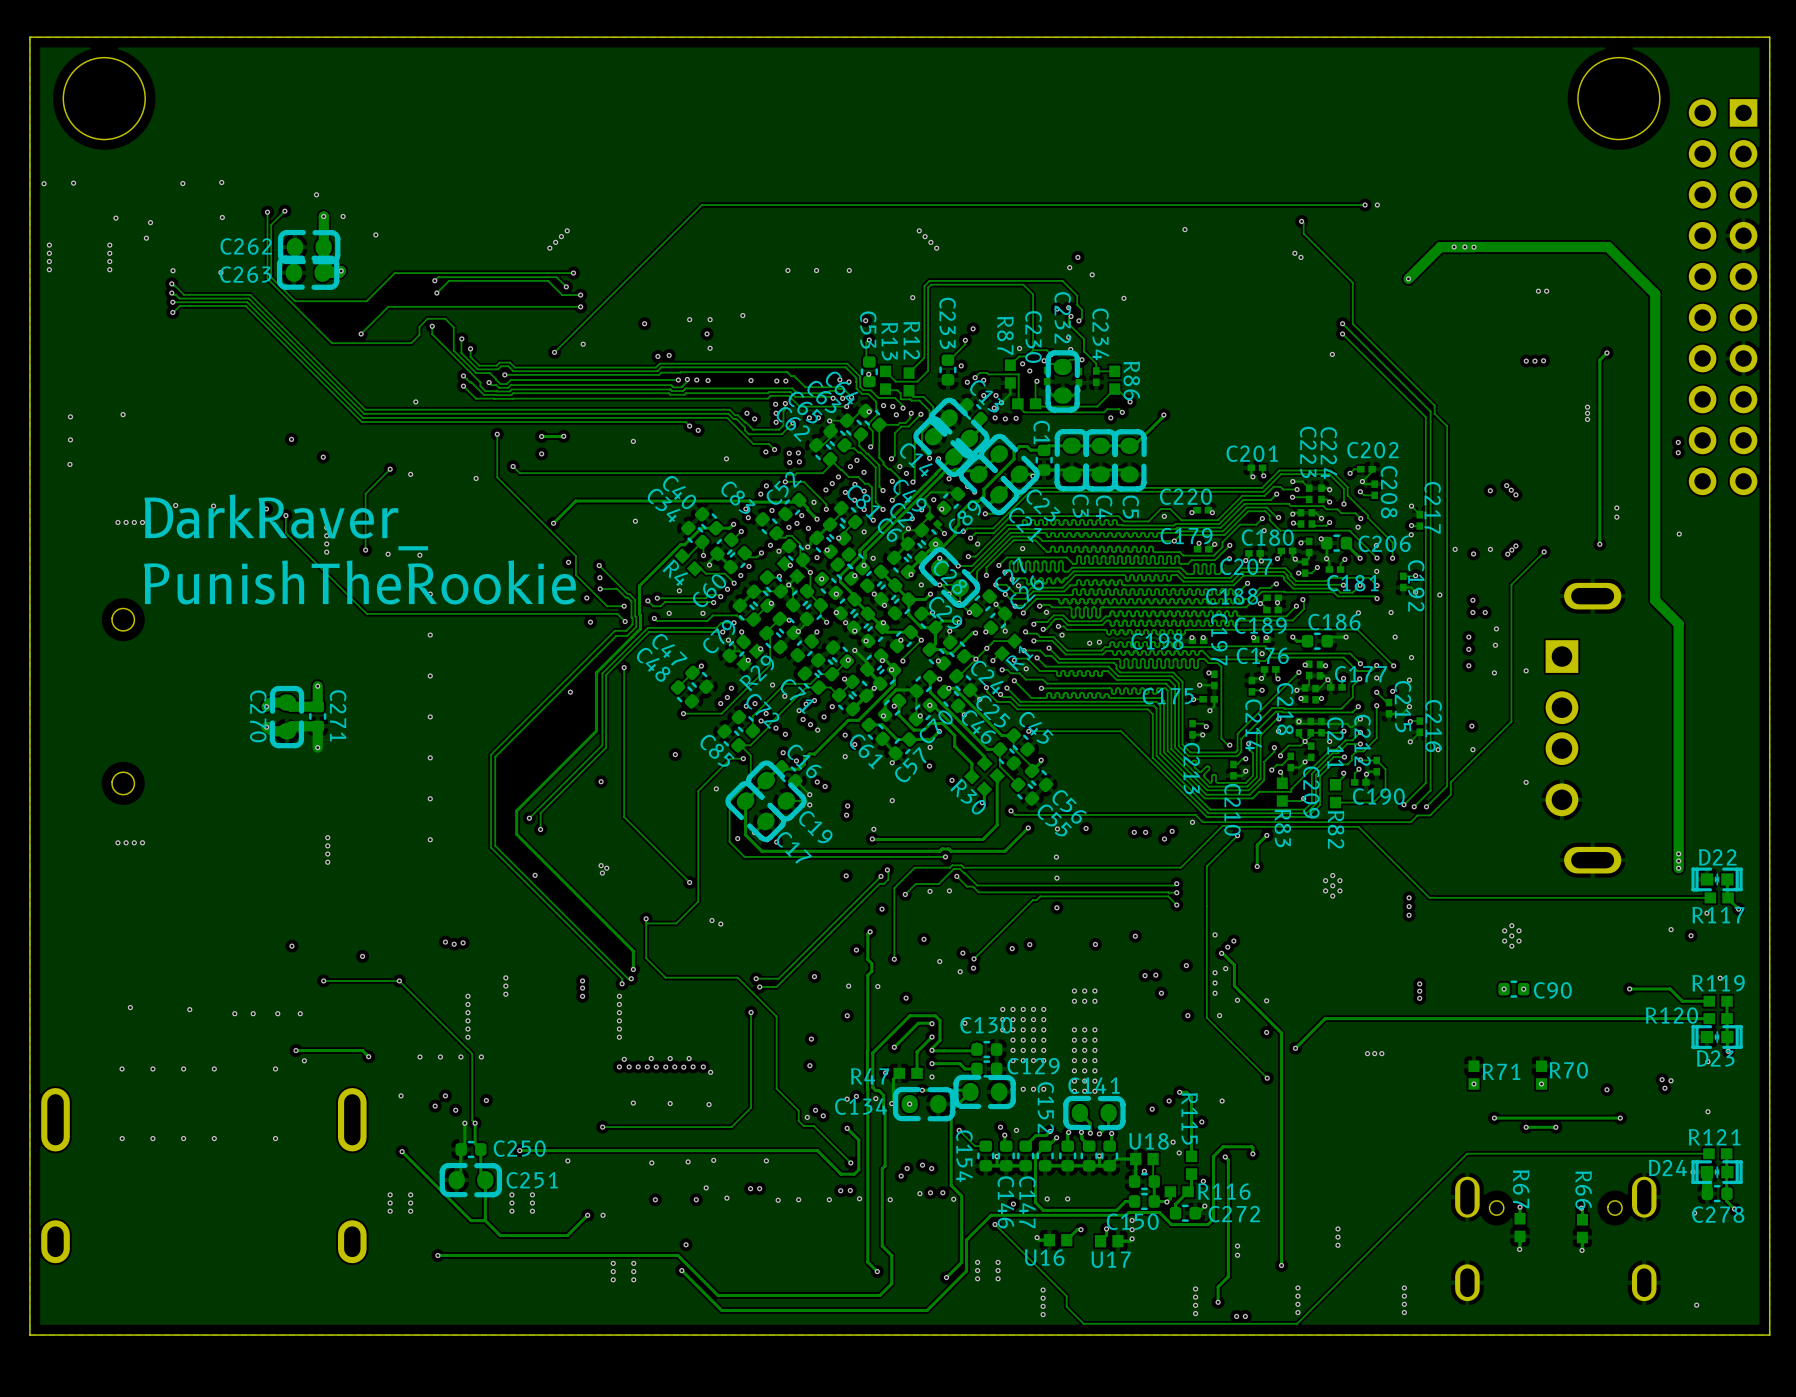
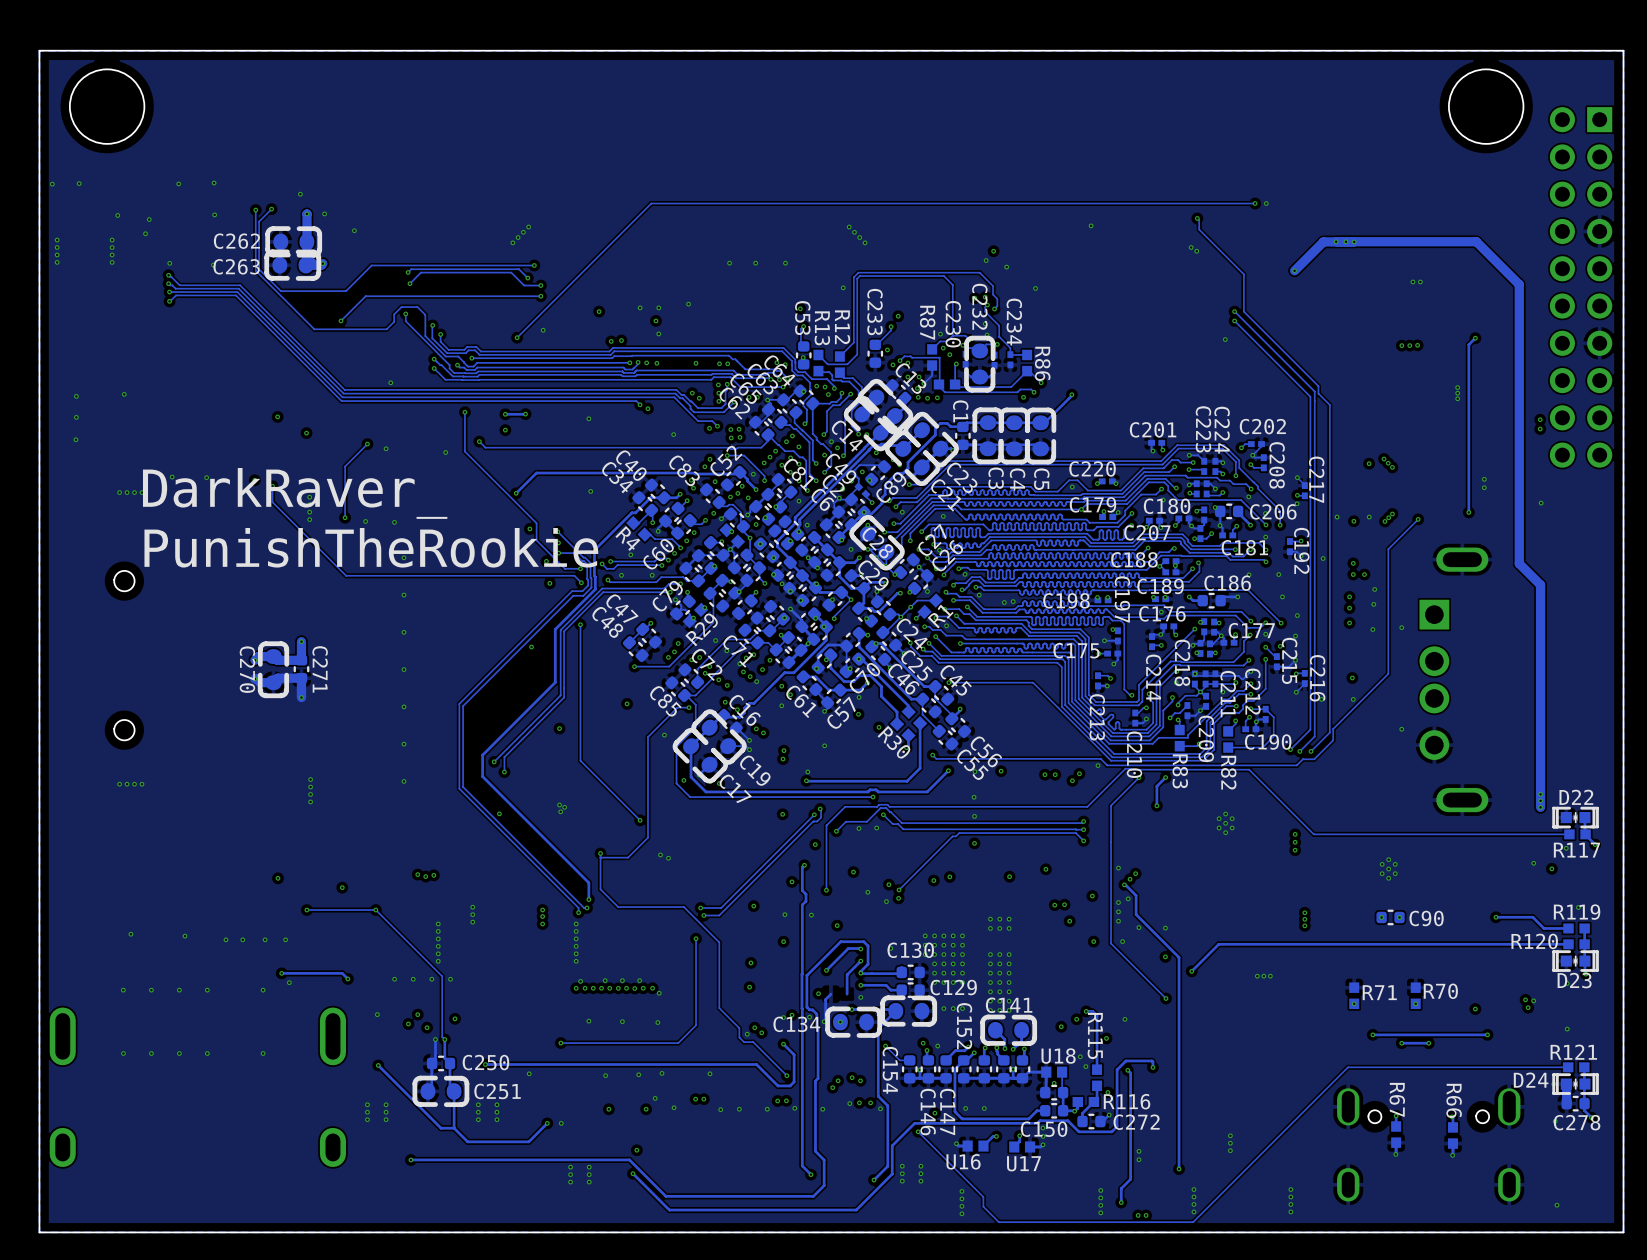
R47: (908, 1073) -> none

